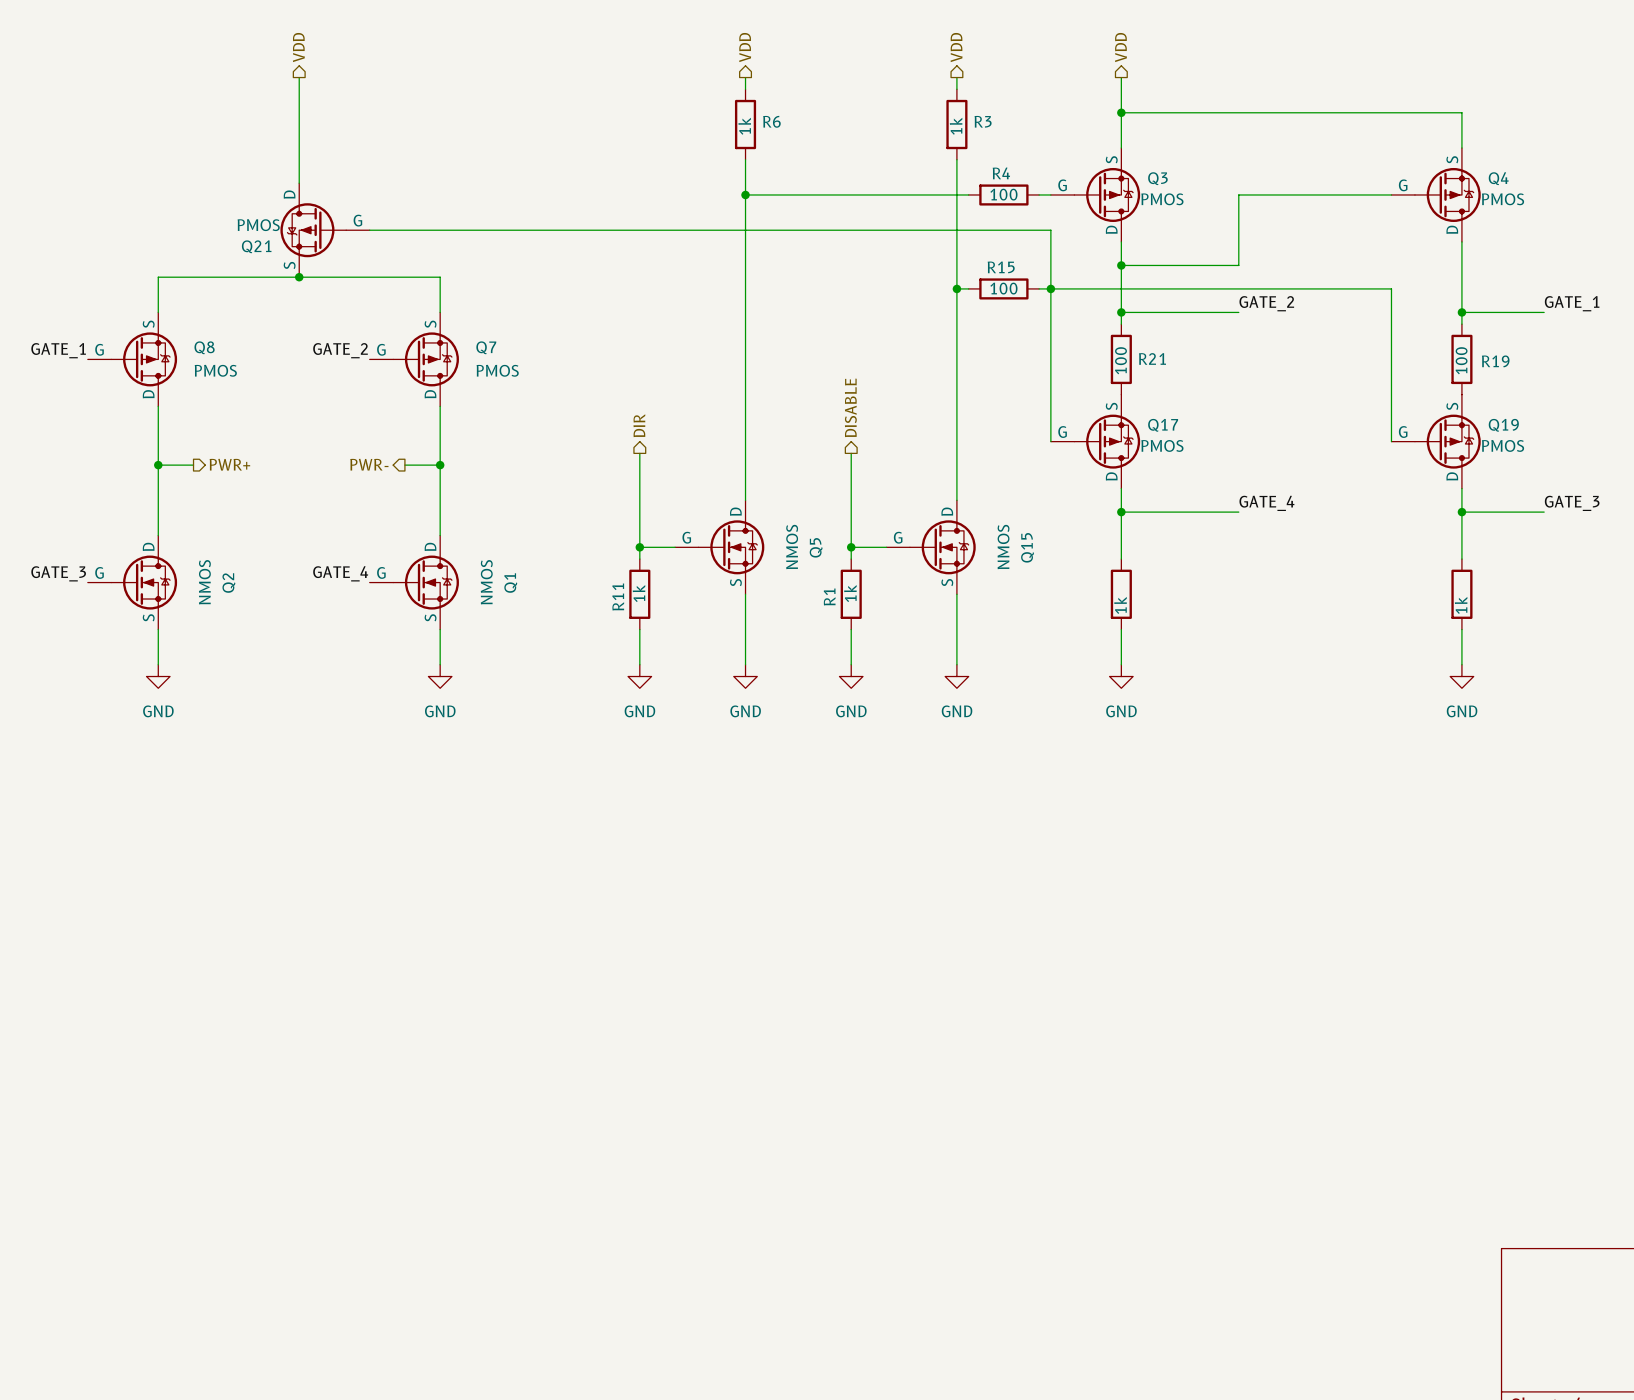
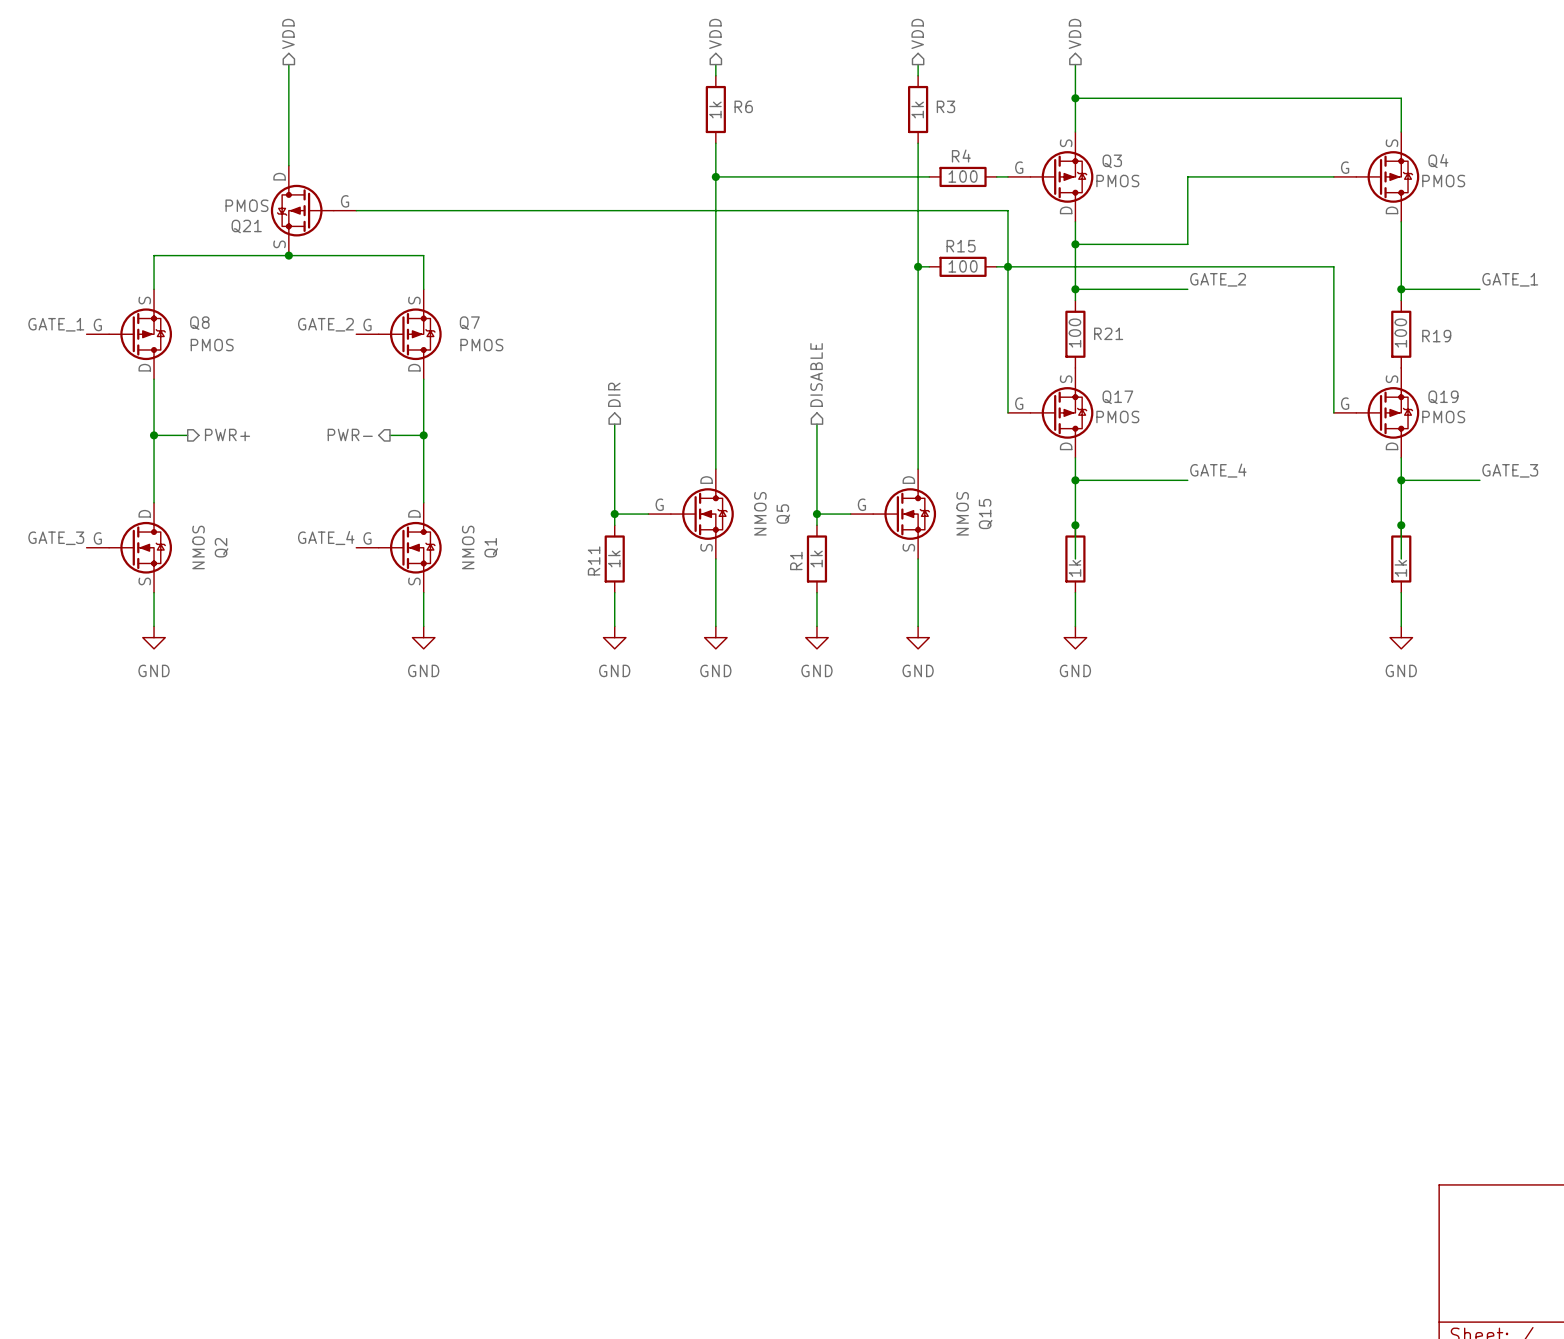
wire: none -> (1075, 525) (1075, 558)
junction: none -> (1075, 525)
wire: none -> (1401, 525) (1401, 558)
junction: none -> (1401, 525)

